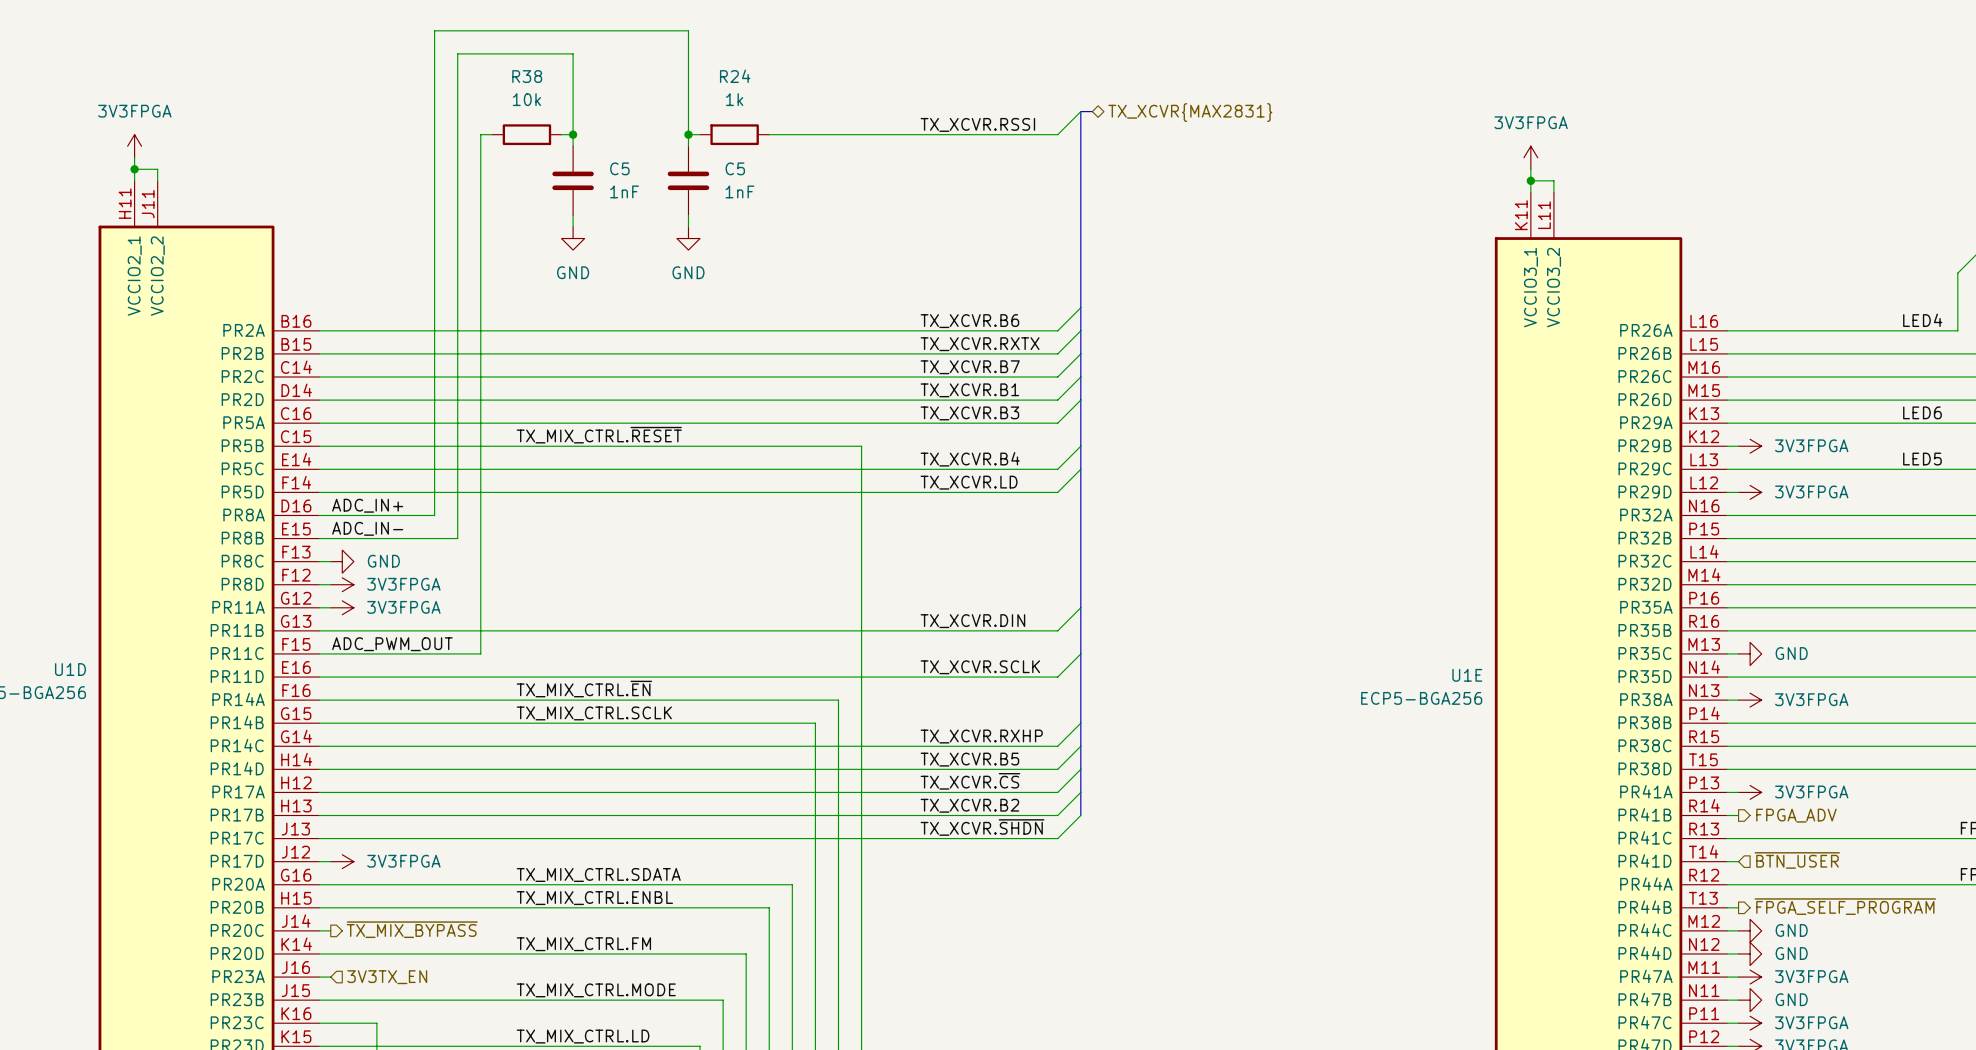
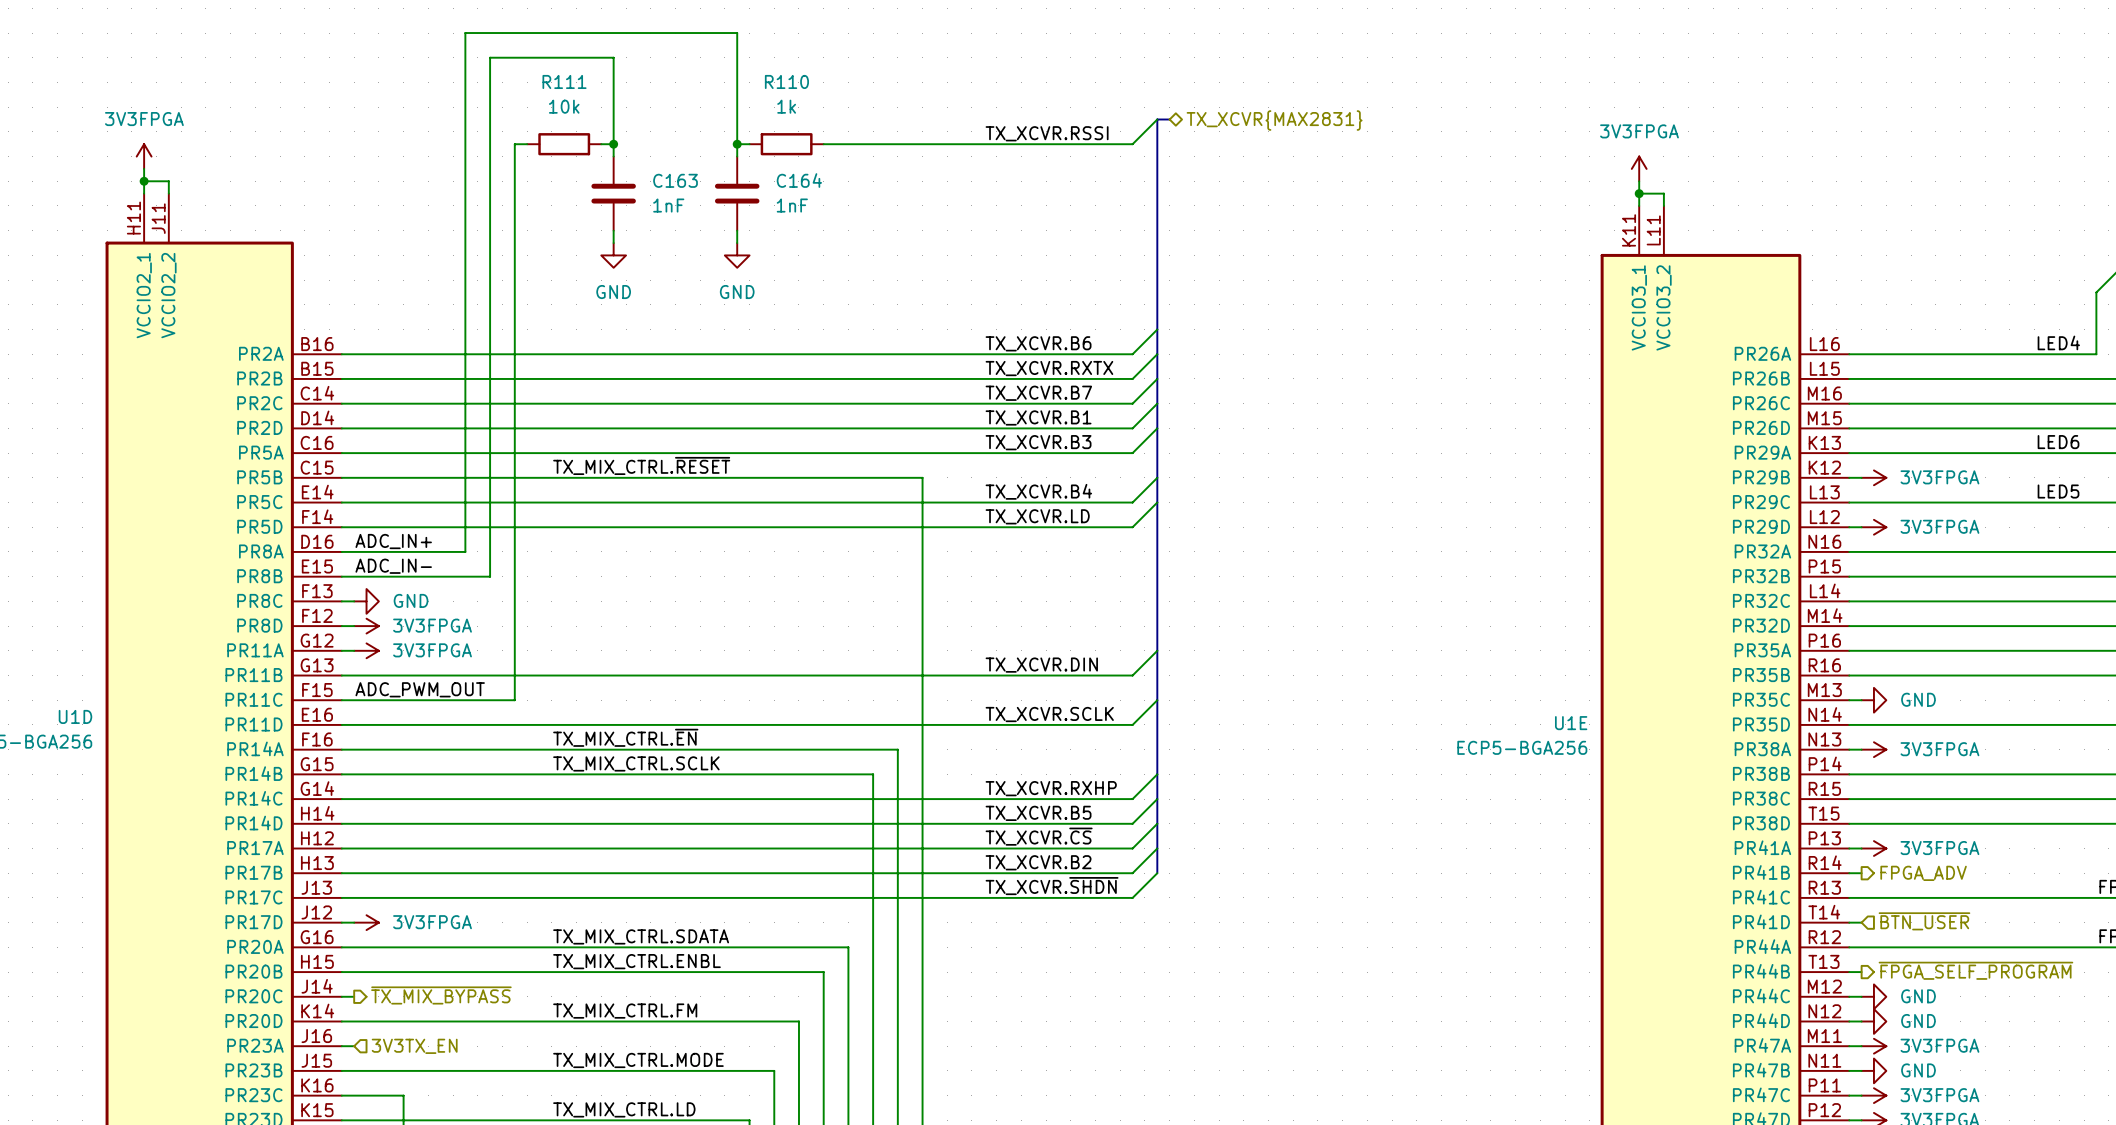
R38 name: R38 (527, 76) -> R111 (564, 81)
R24 name: R24 (735, 76) -> R110 (786, 81)
C5 name: C5 (619, 168) -> C163 (675, 180)
C5 name: C5 (735, 168) -> C164 (799, 180)

